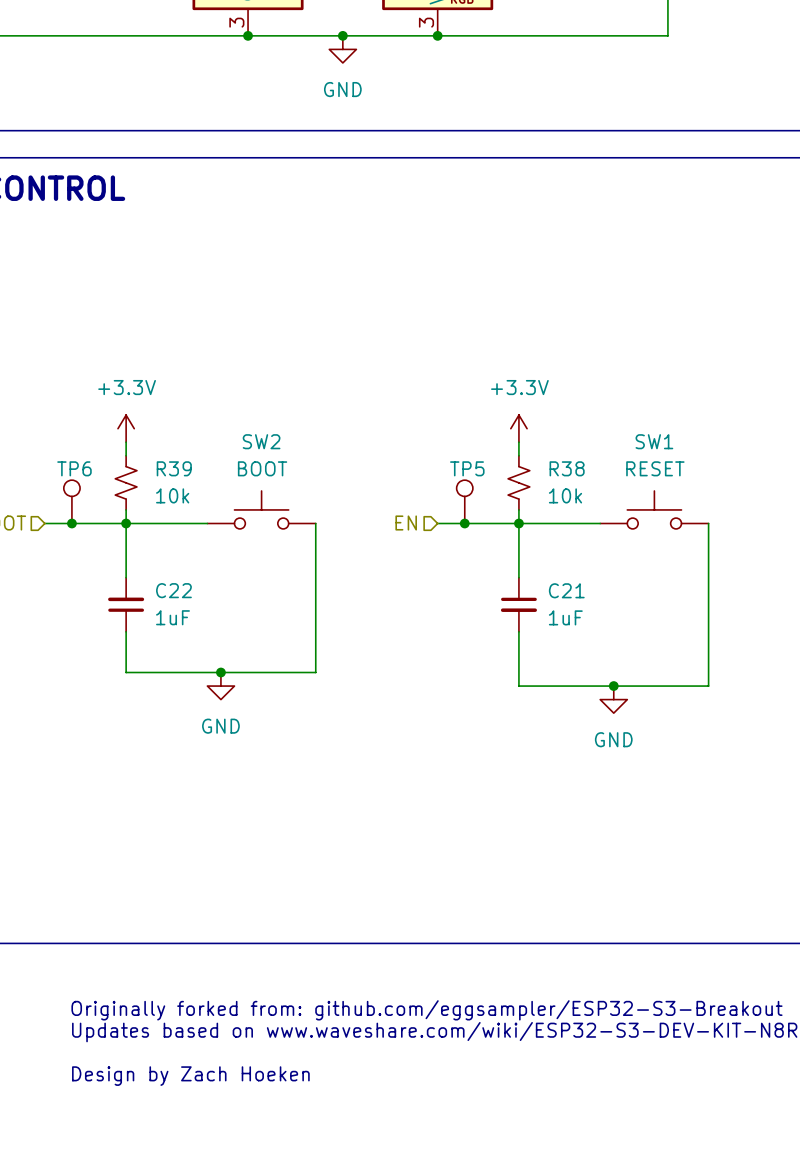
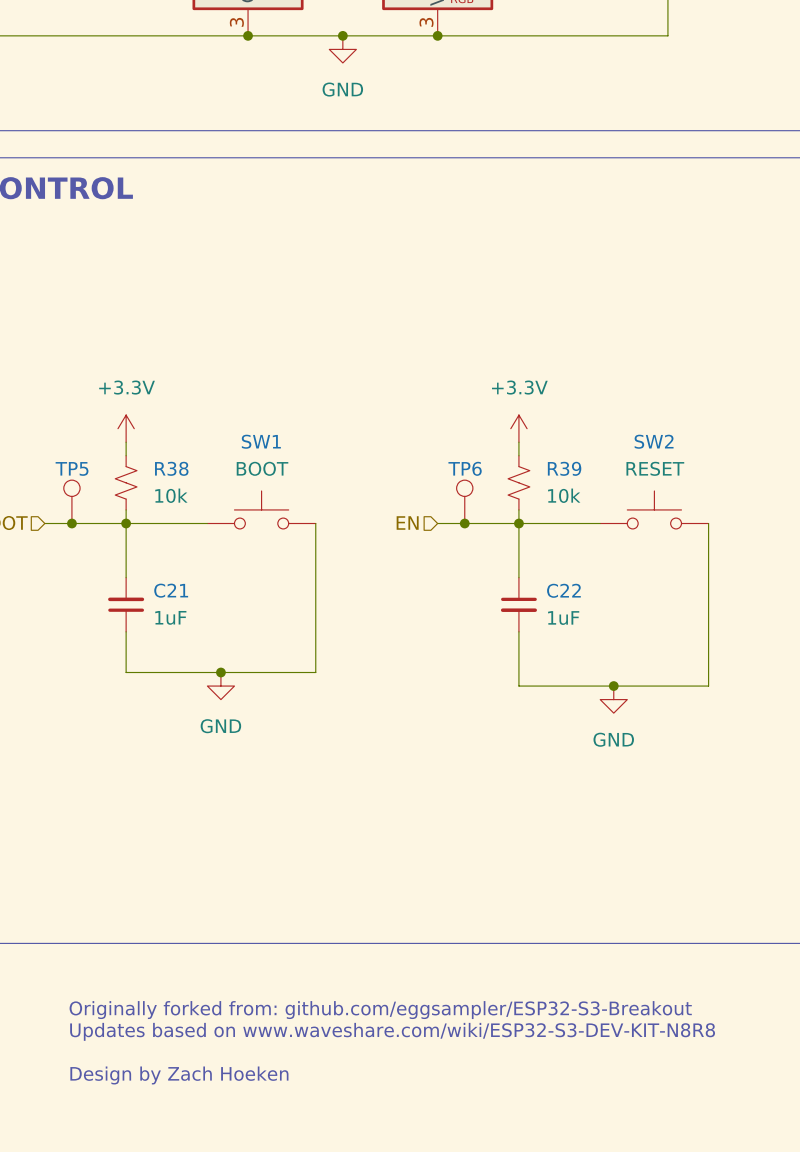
SW2 name: SW2 (261, 441) -> SW1 (261, 441)
SW1 name: SW1 (654, 441) -> SW2 (654, 441)
TP6 name: TP6 (74, 468) -> TP5 (72, 468)
R39 name: R39 (174, 468) -> R38 (171, 468)
TP5 name: TP5 (467, 468) -> TP6 (465, 468)
R38 name: R38 (567, 468) -> R39 (564, 468)
C22 name: C22 (173, 590) -> C21 (171, 590)
C21 name: C21 (566, 590) -> C22 (563, 590)

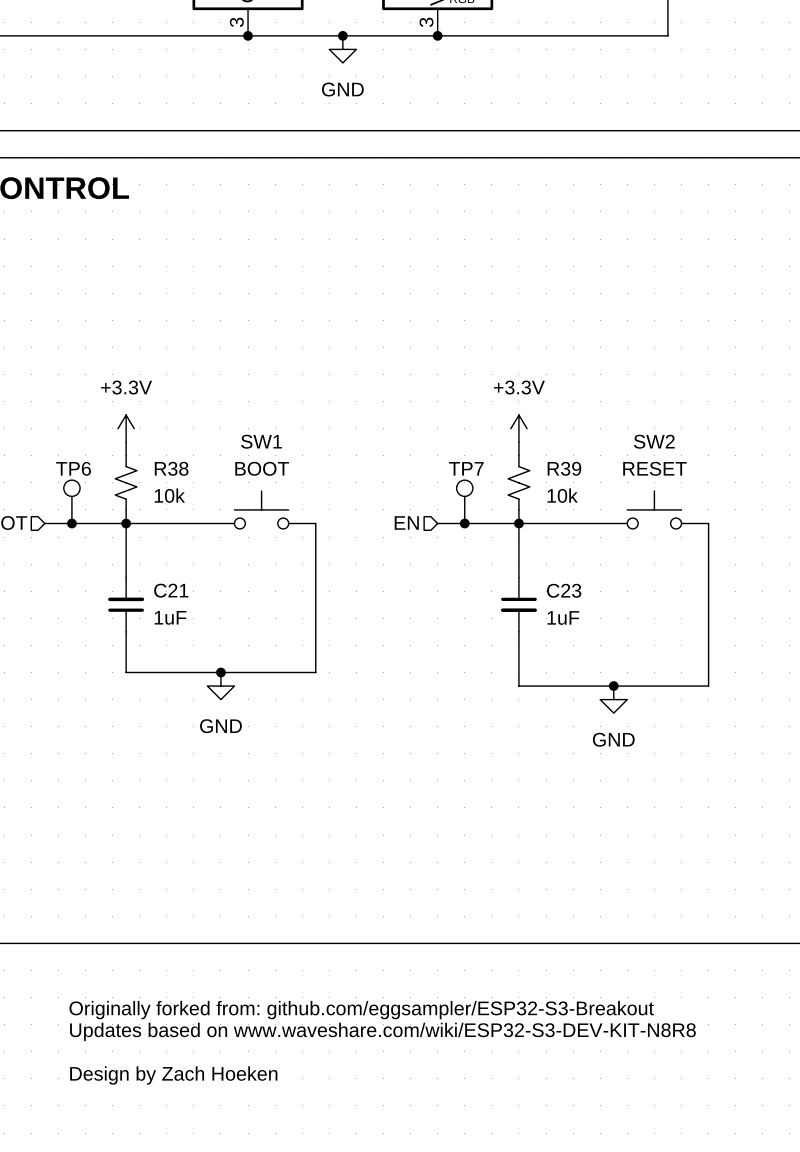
TP5 name: TP5 (72, 468) -> TP6 (73, 468)
TP6 name: TP6 (465, 468) -> TP7 (466, 468)
C22 name: C22 (563, 590) -> C23 (564, 590)

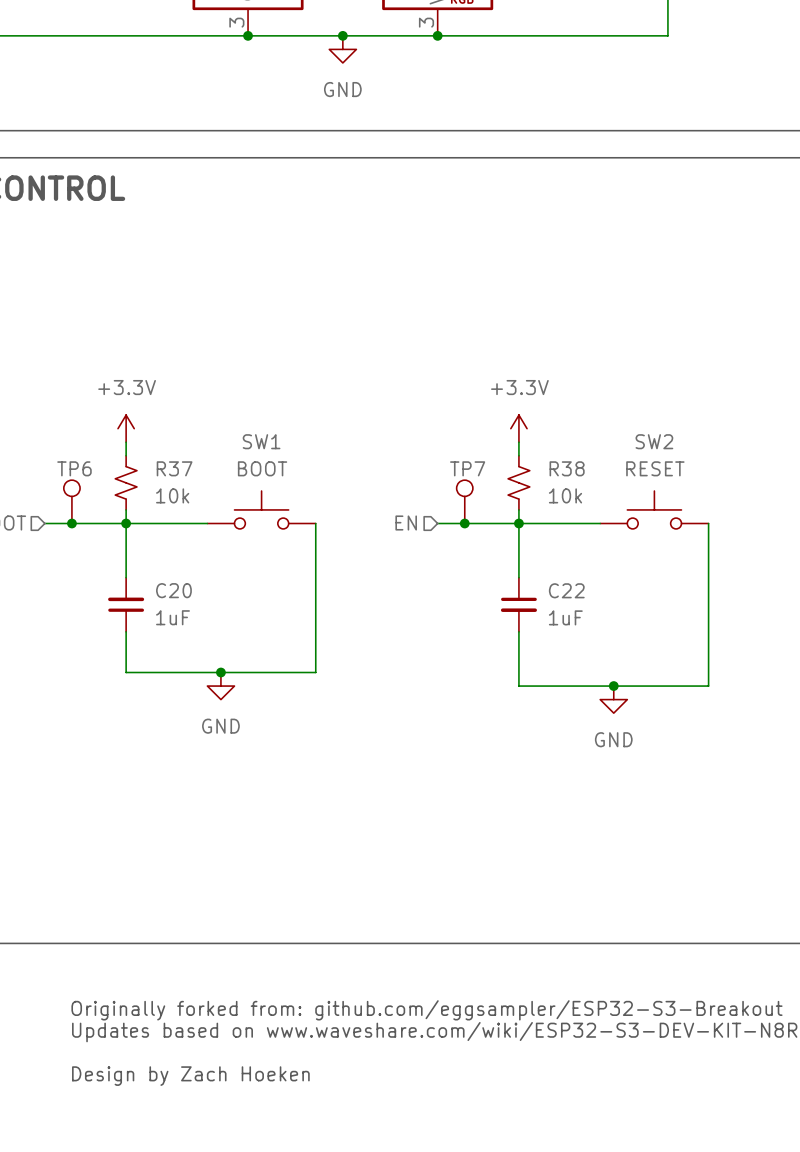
R38 name: R38 (171, 468) -> R37 (174, 468)
R39 name: R39 (564, 468) -> R38 (567, 468)
C21 name: C21 (171, 590) -> C20 (173, 590)
C23 name: C23 (564, 590) -> C22 (566, 590)

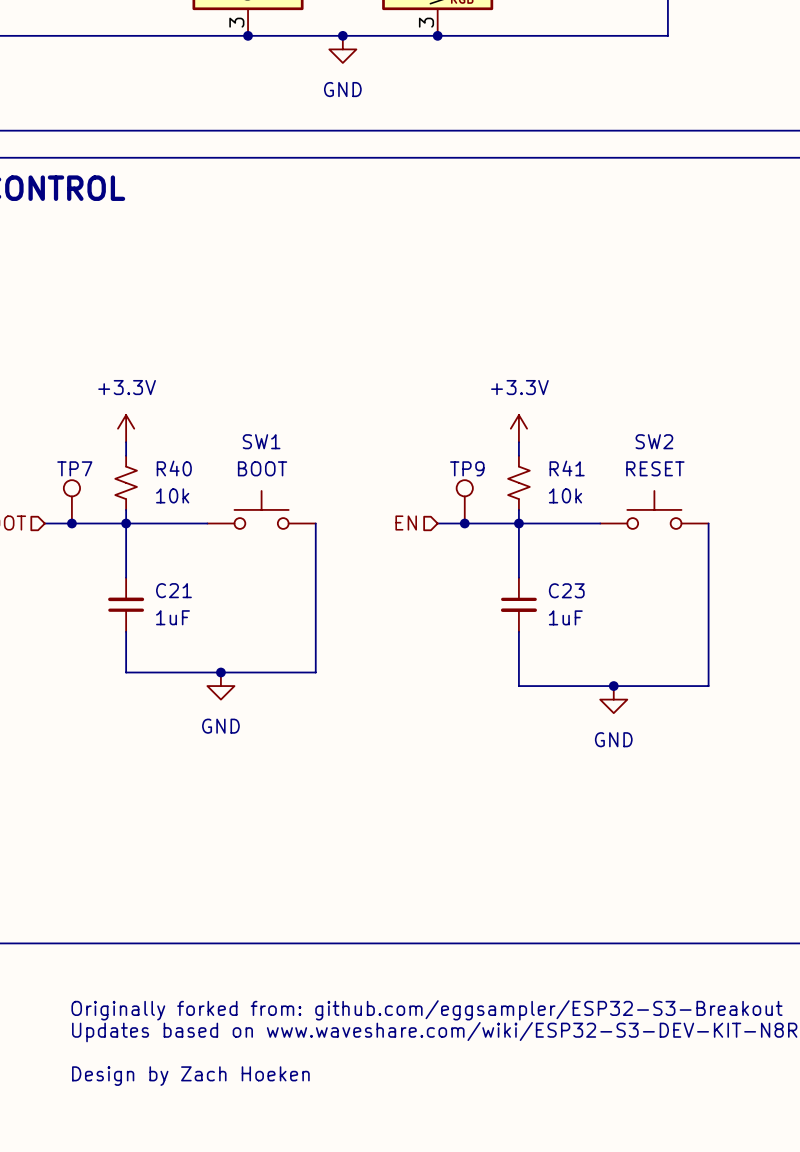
TP6 name: TP6 (74, 468) -> TP7 (74, 468)
R37 name: R37 (174, 468) -> R40 (174, 468)
TP7 name: TP7 (467, 468) -> TP9 (467, 468)
R38 name: R38 (567, 468) -> R41 (567, 468)
C20 name: C20 (173, 590) -> C21 (173, 590)
C22 name: C22 (566, 590) -> C23 (566, 590)

